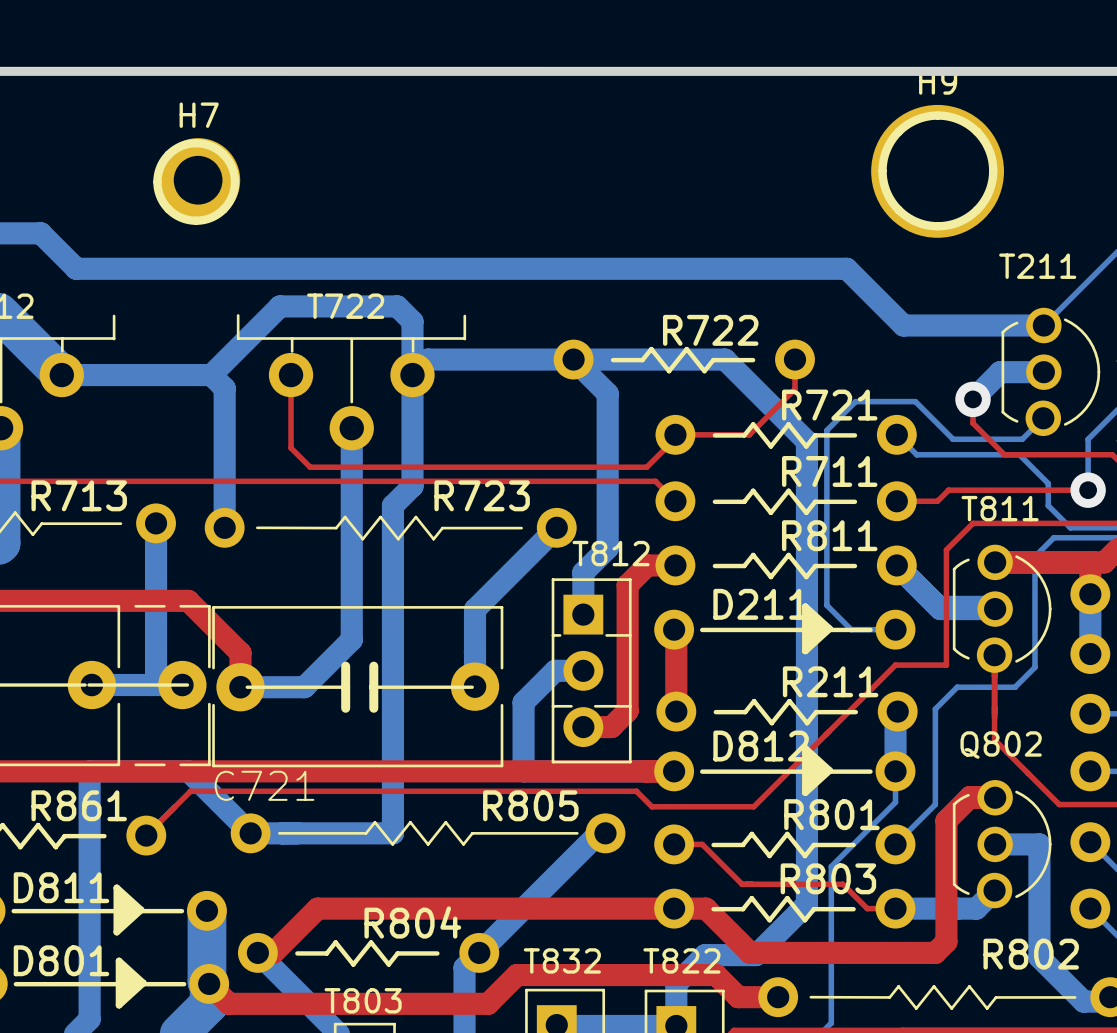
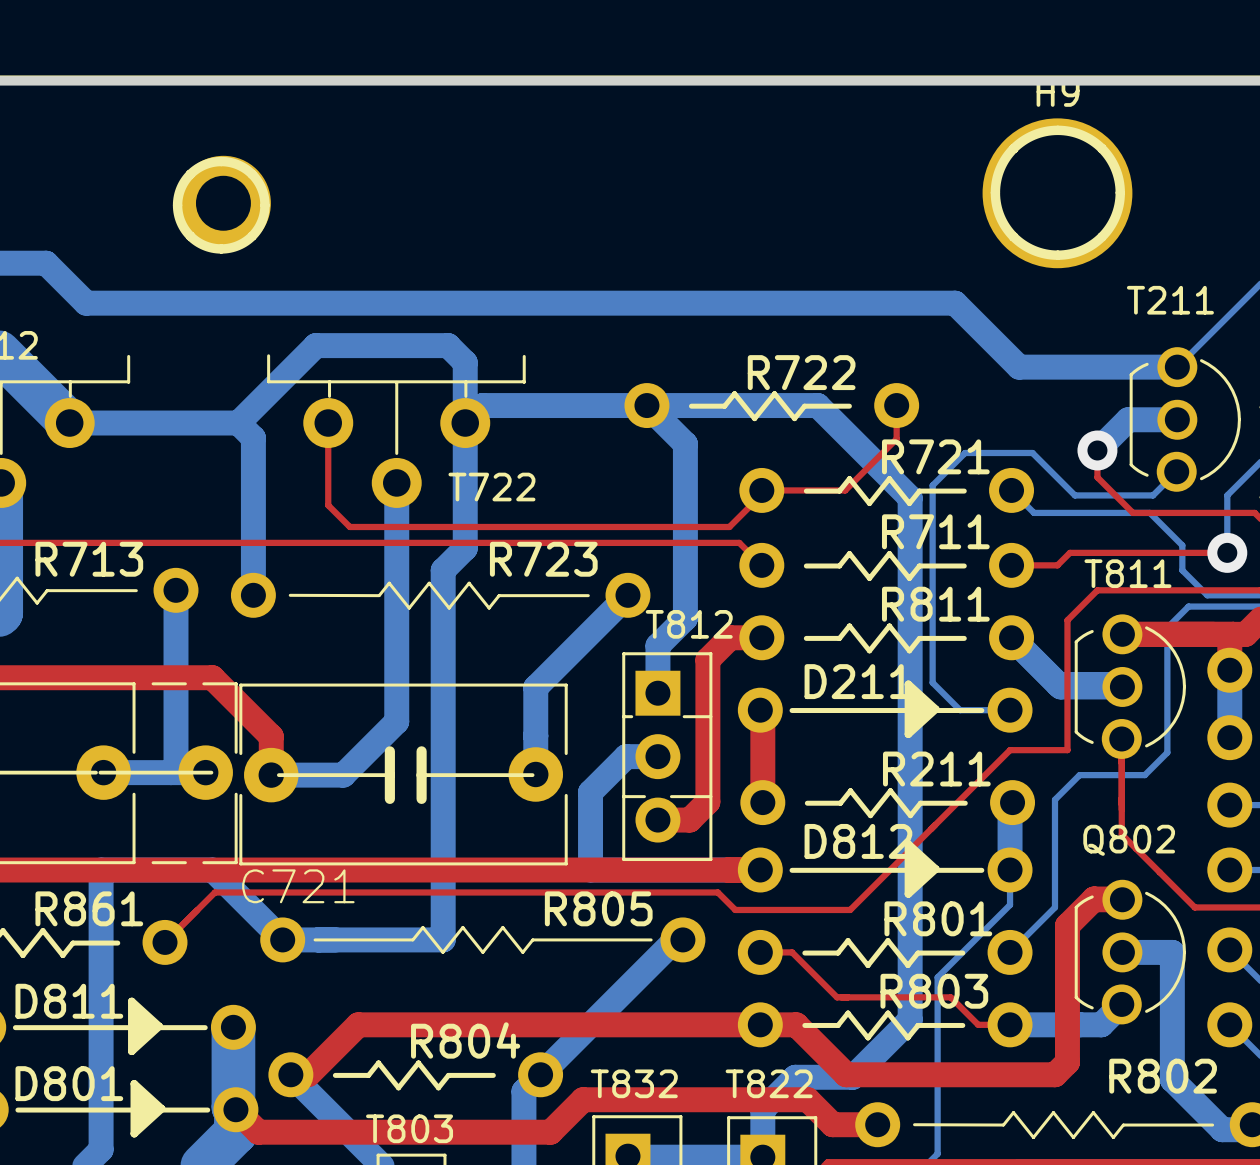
H7 name: H7 (199, 115) -> none
T722 name position: T722 (345, 306) -> T722 (491, 487)

